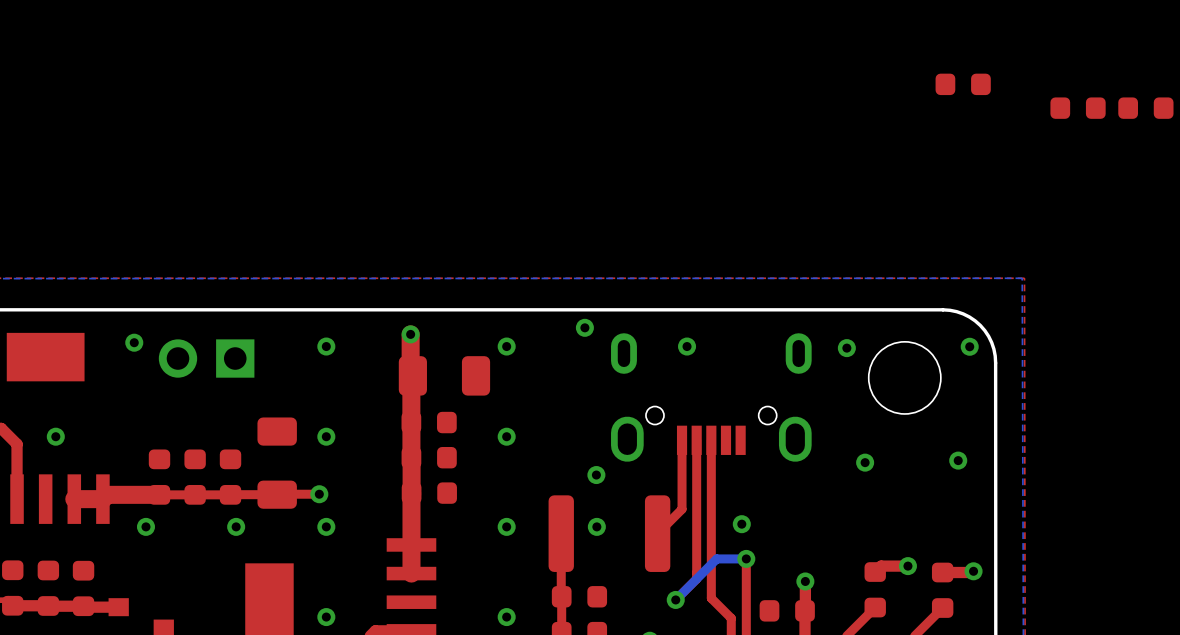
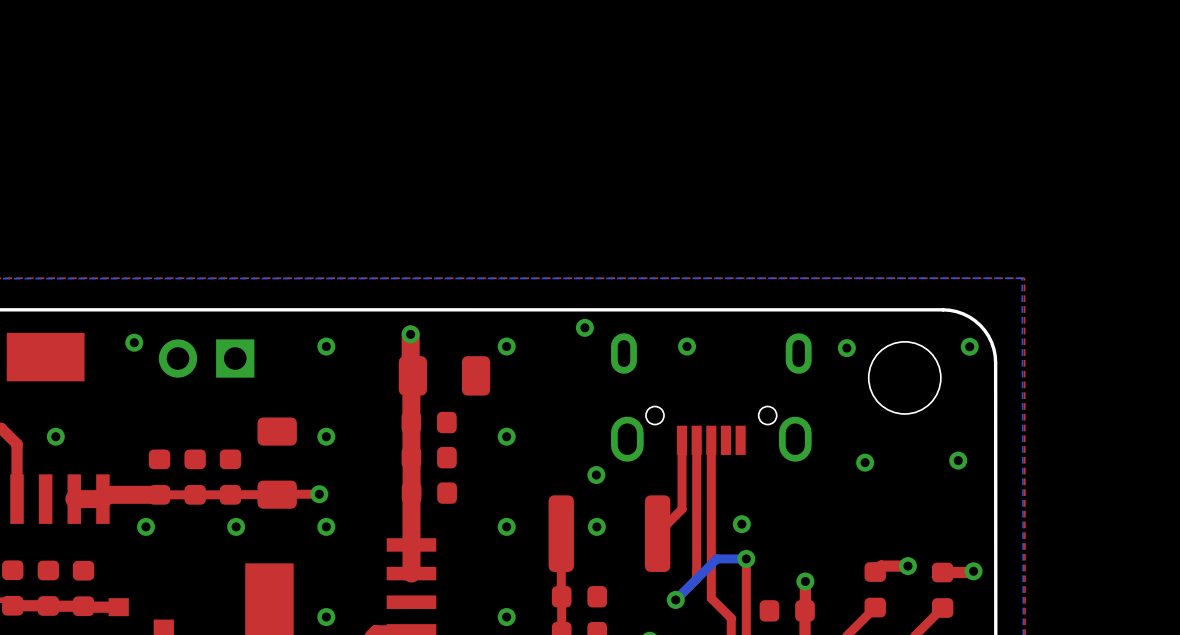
part: (963, 84) -> none
part: (1078, 108) -> none
part: (1145, 108) -> none

